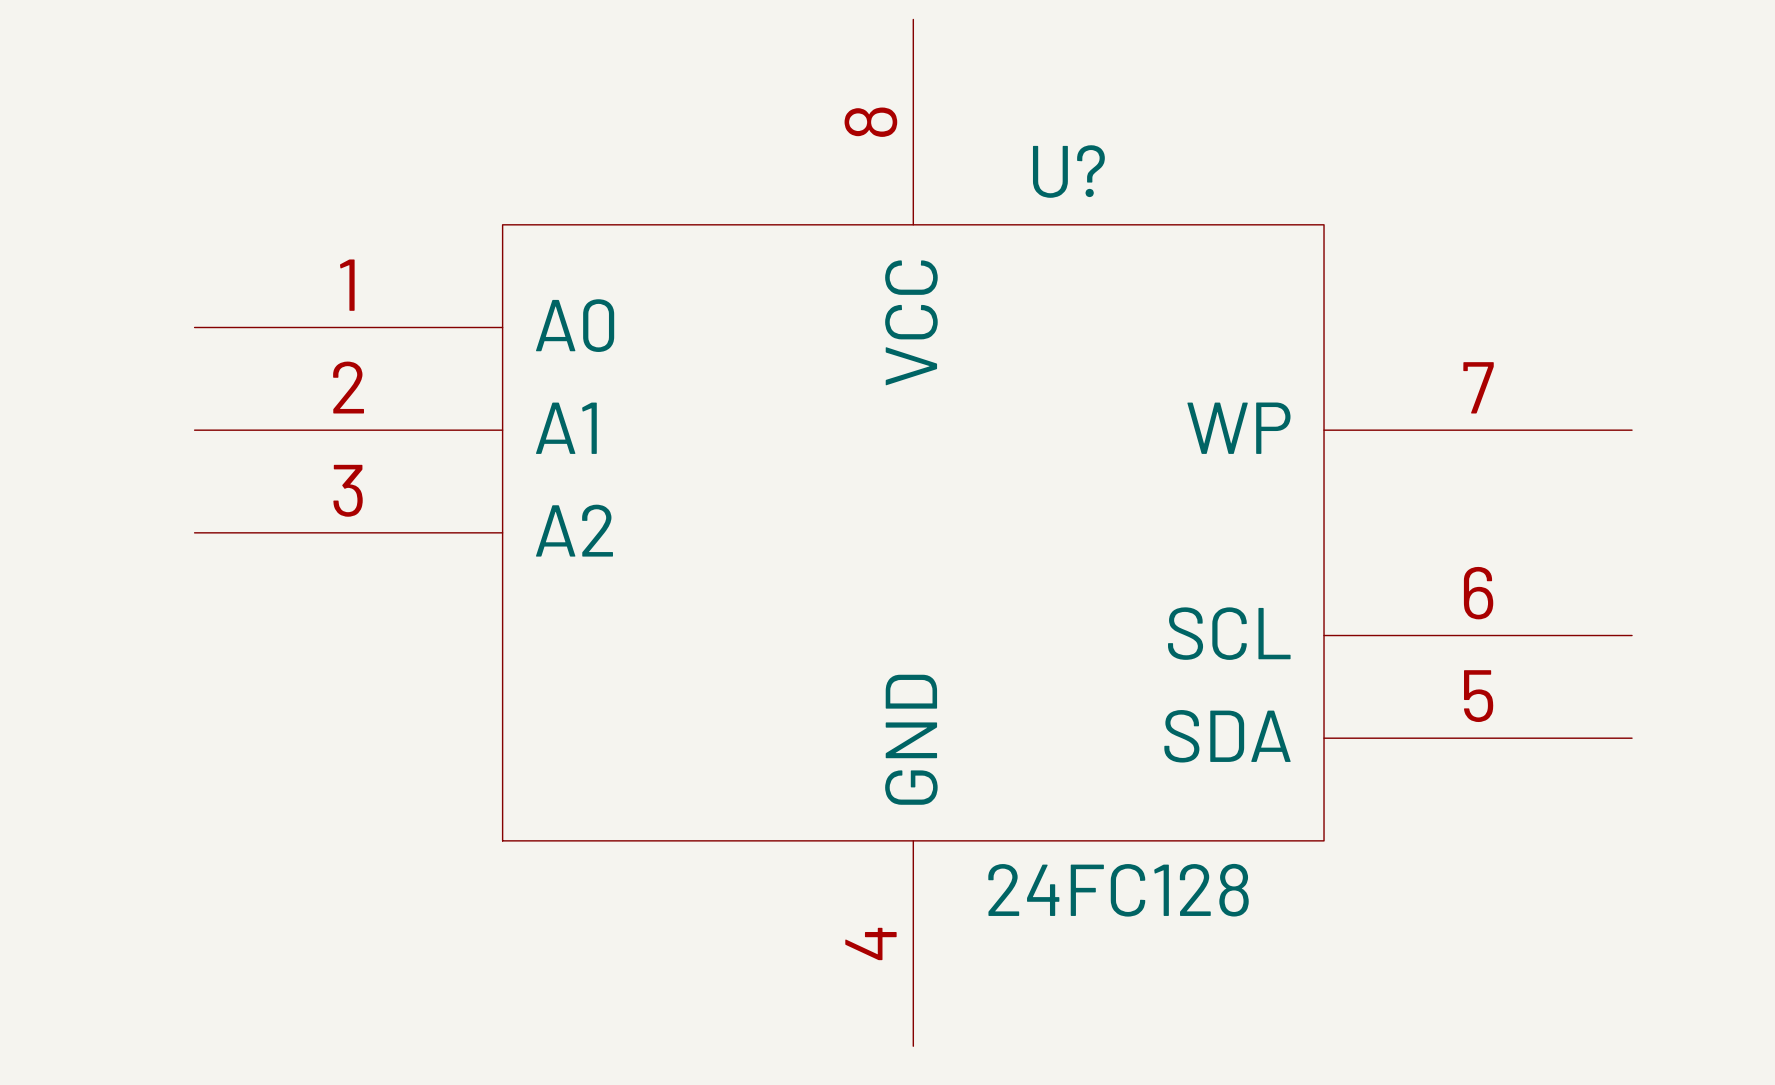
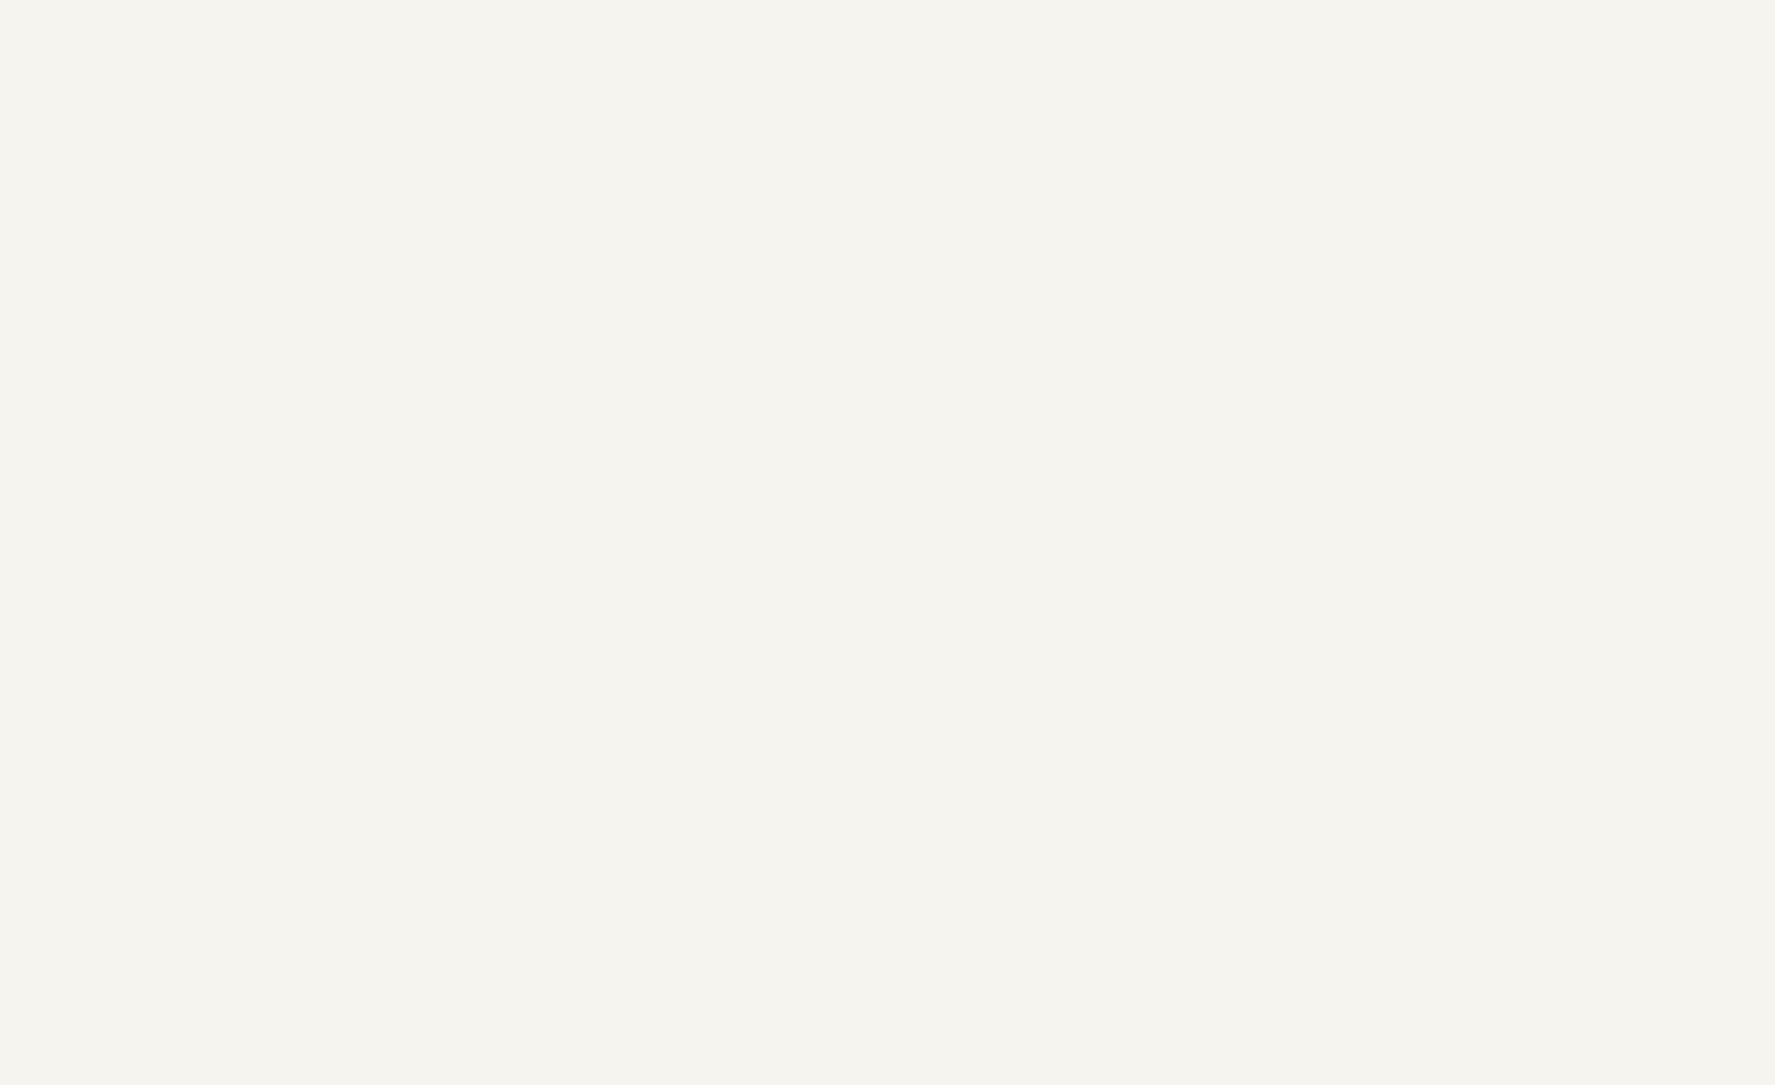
U?: 24FC128 (913, 532) -> none

